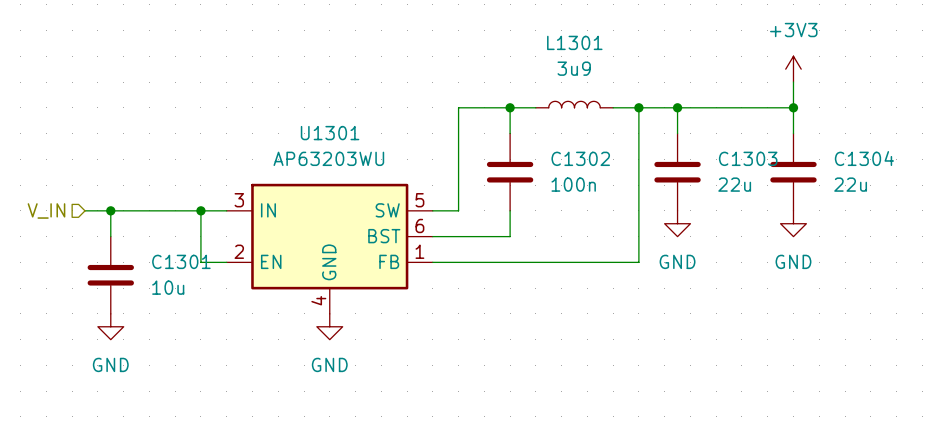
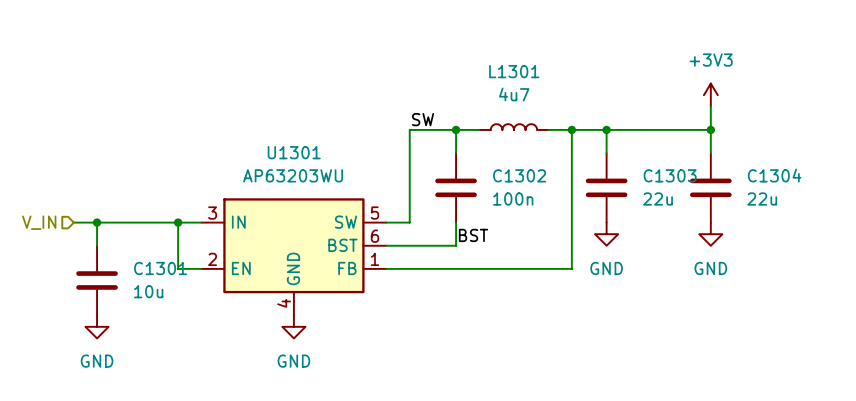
L1301 value: 3u9 (574, 68) -> 4u7 (514, 94)
label: none -> SW (423, 119)
label: none -> BST (473, 235)

